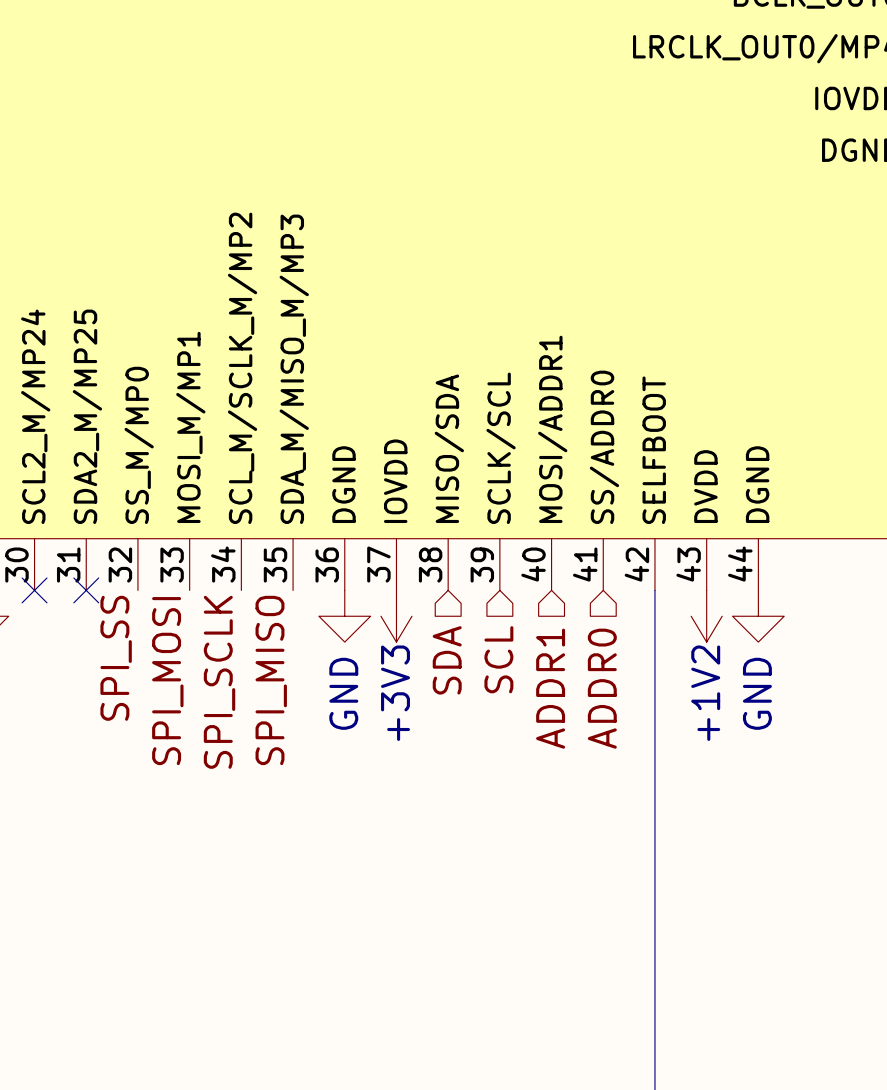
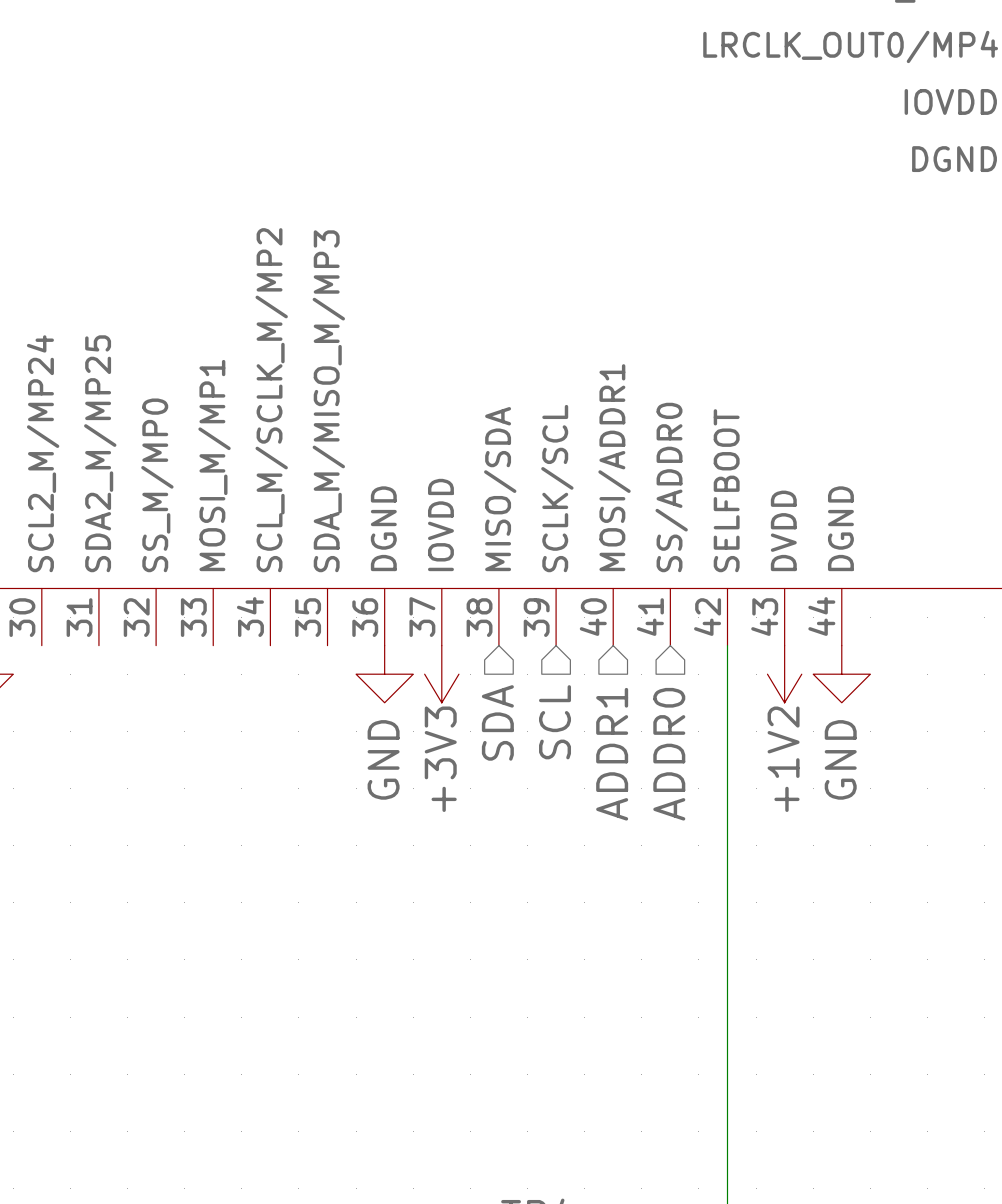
no-connect mark: (34, 590) -> none
no-connect mark: (86, 590) -> none
label: SPI_SS (116, 658) -> none
label: SPI_MISO (271, 680) -> none
label: SPI_MOSI (167, 681) -> none
label: SPI_SCLK (219, 682) -> none

